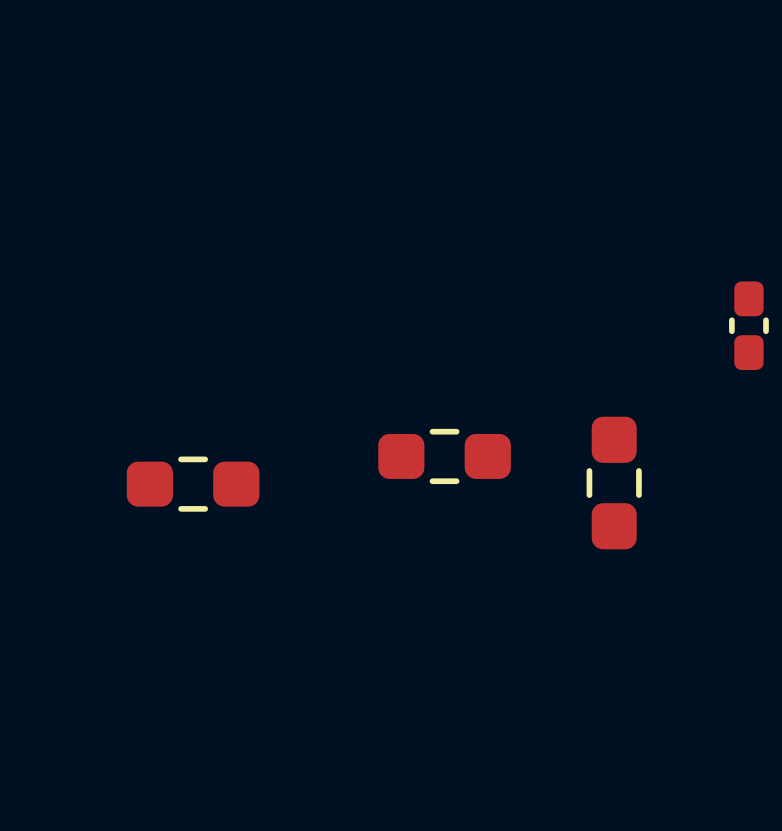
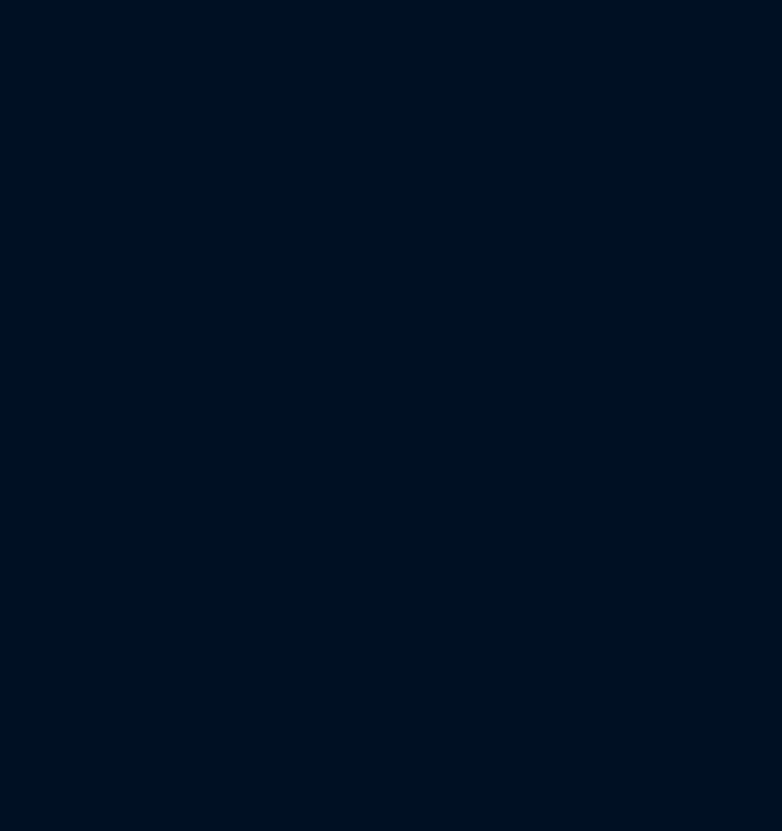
part: (748, 325) -> none
part: (444, 456) -> none
part: (614, 483) -> none
part: (193, 484) -> none

